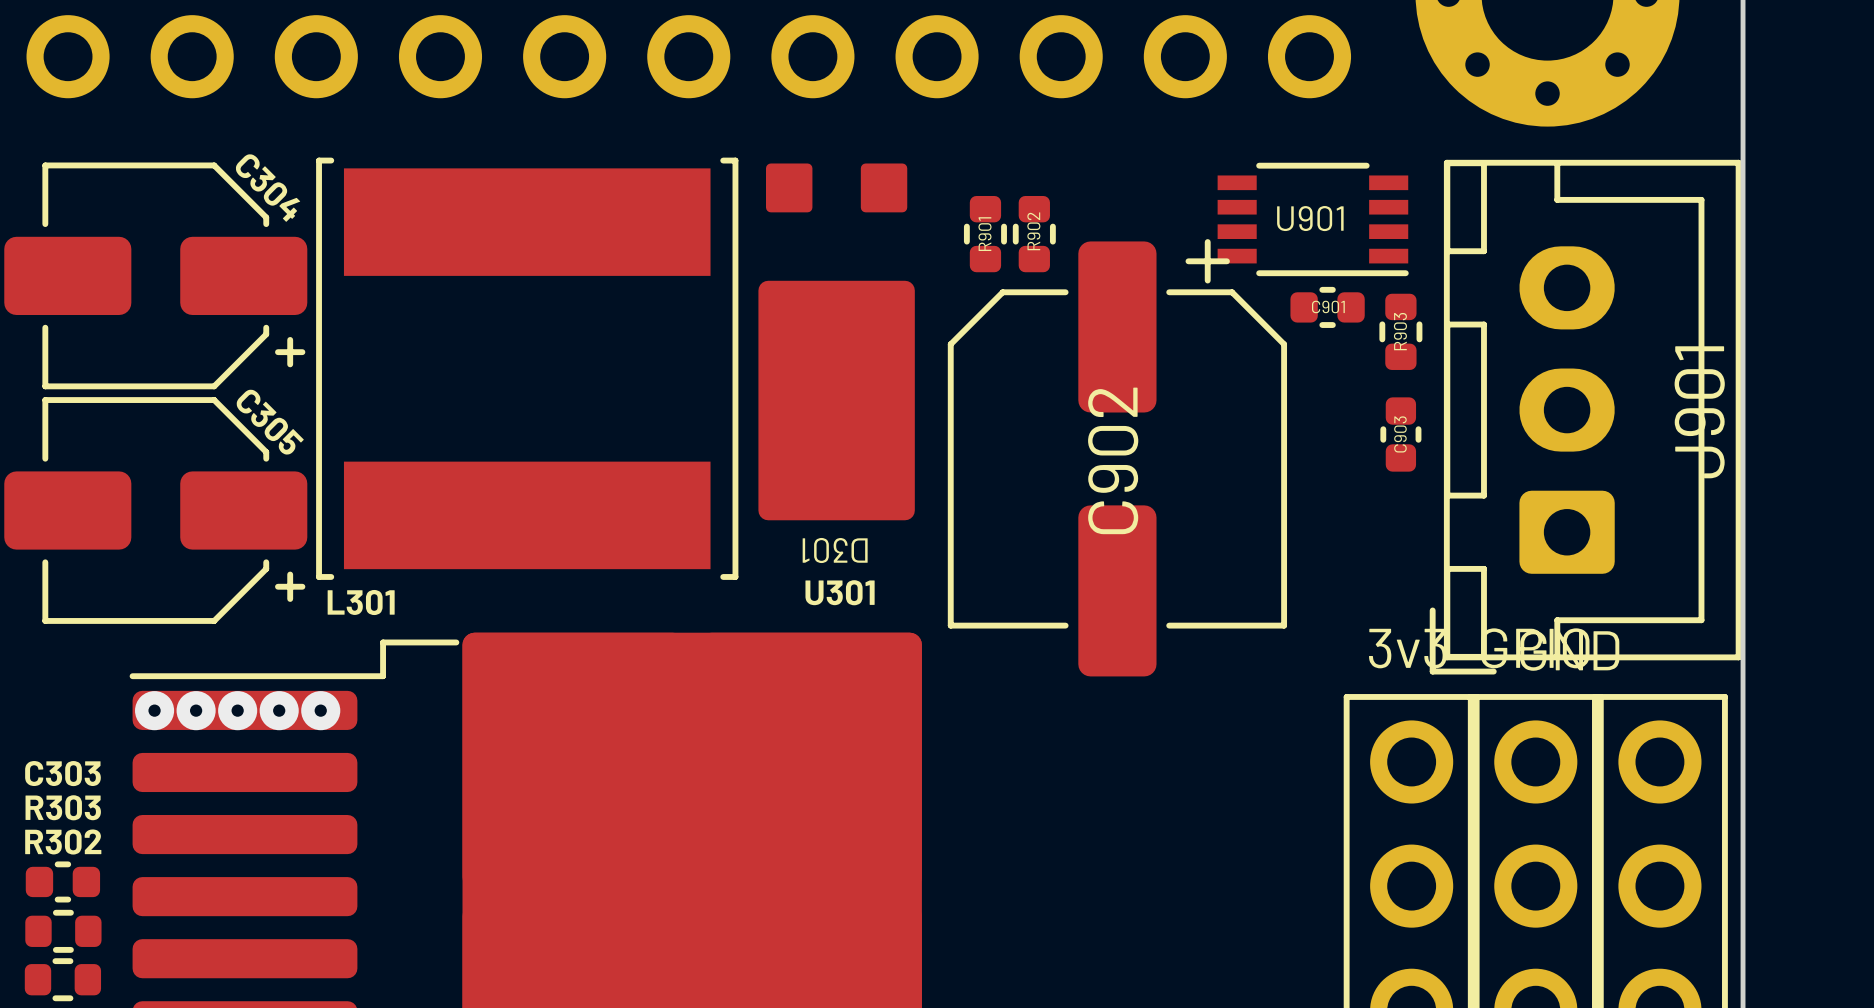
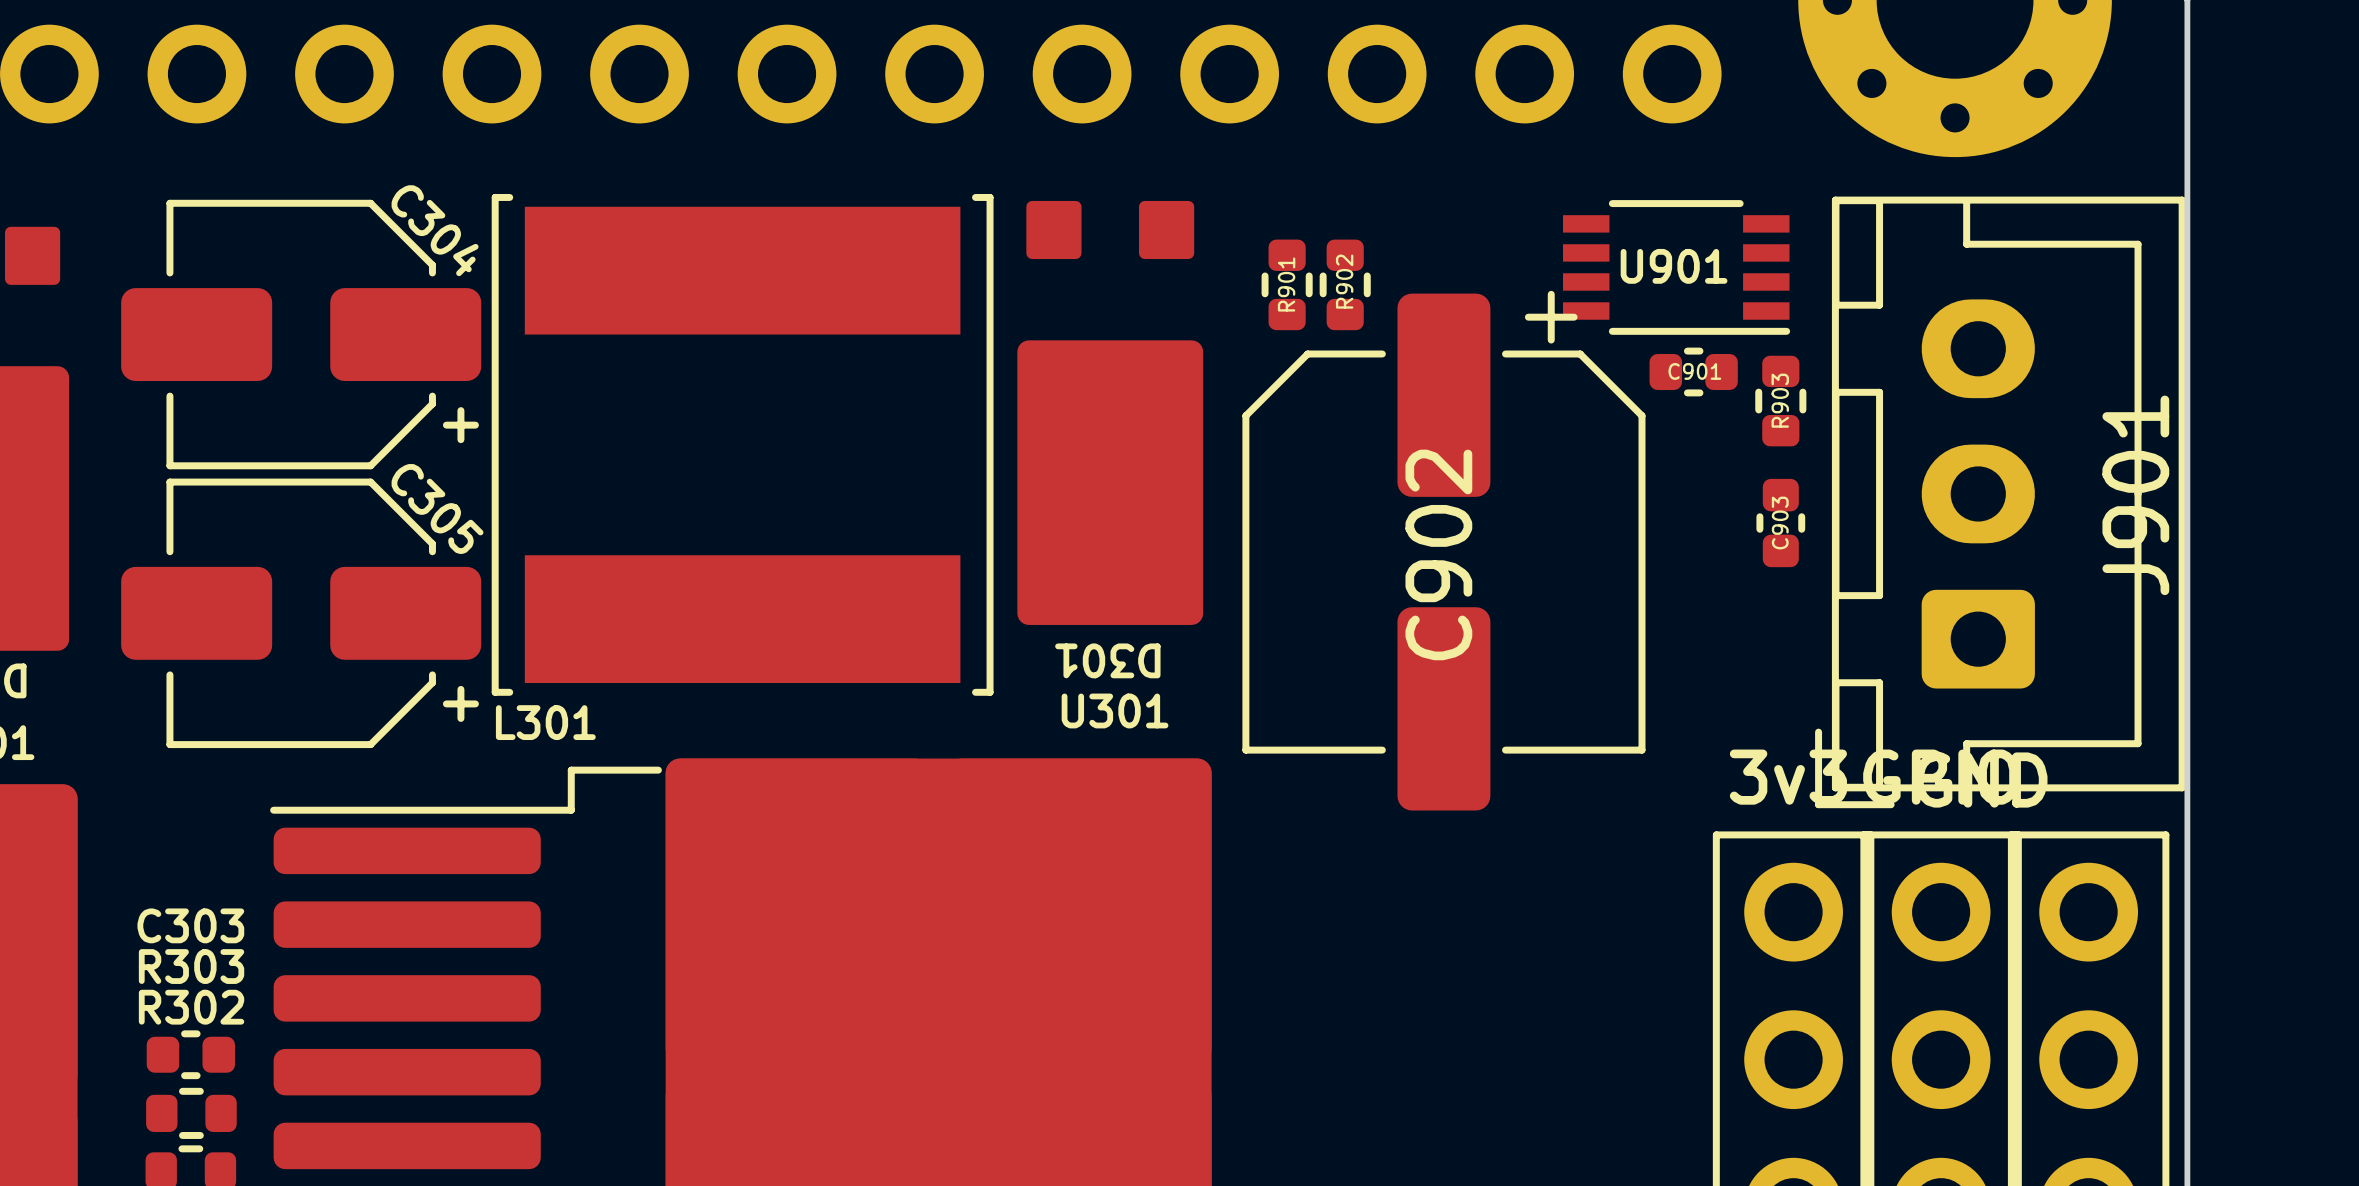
via: (154, 710) -> none
via: (196, 710) -> none
via: (237, 710) -> none
via: (279, 710) -> none
via: (320, 710) -> none

